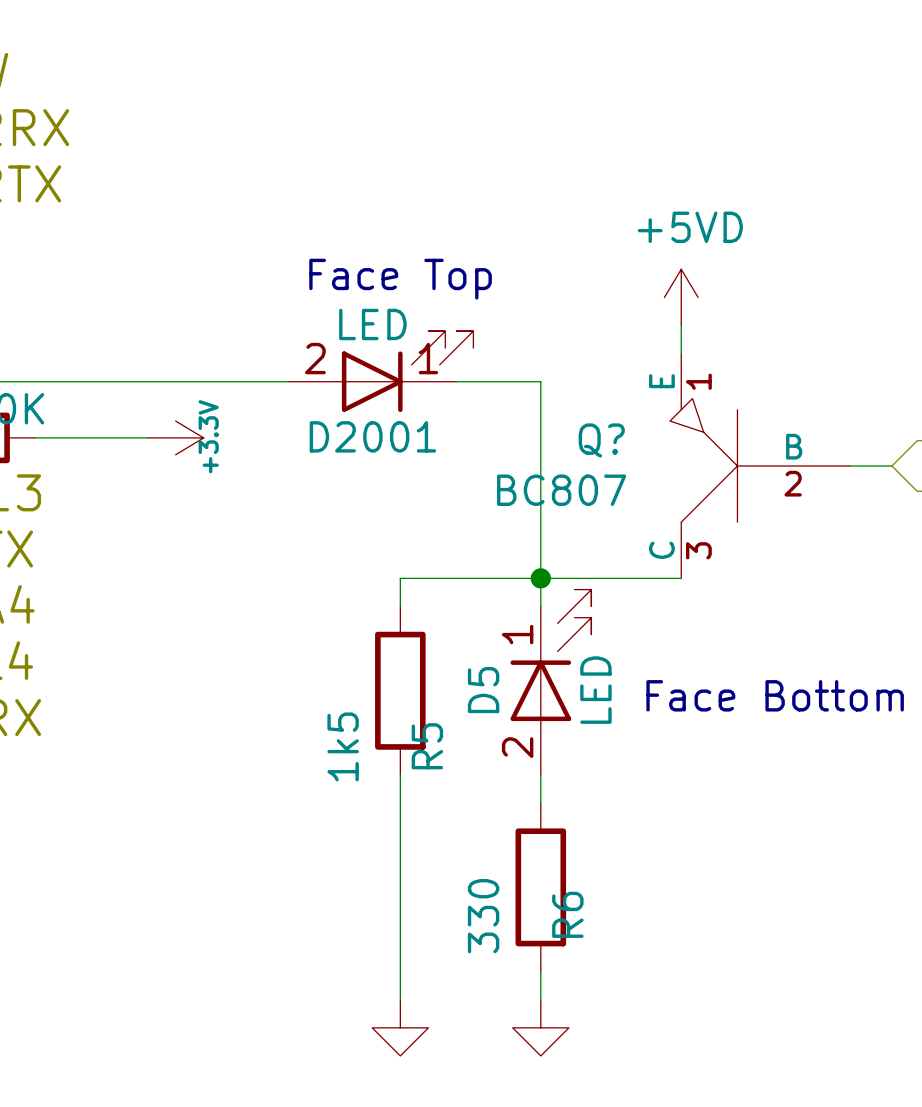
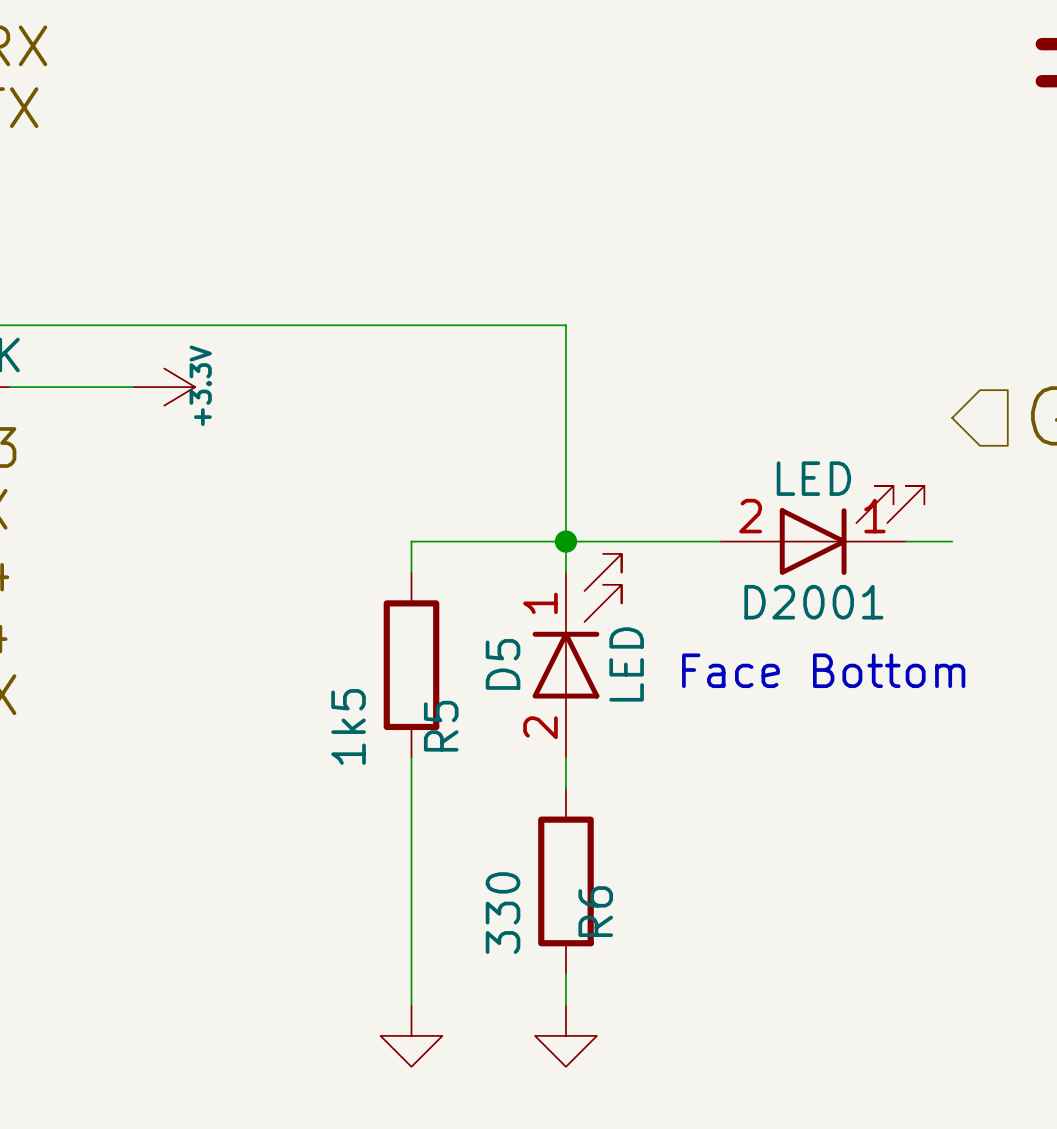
text: Face Top (400, 279) -> none
power symbol: +5VD (681, 297) -> none
wire: (681, 325) (681, 353) -> none
D2001 position: (380, 371) -> (822, 530)
Q?: BC807 (759, 466) -> none
wire: (849, 466) (891, 466) -> (905, 541) (952, 541)

